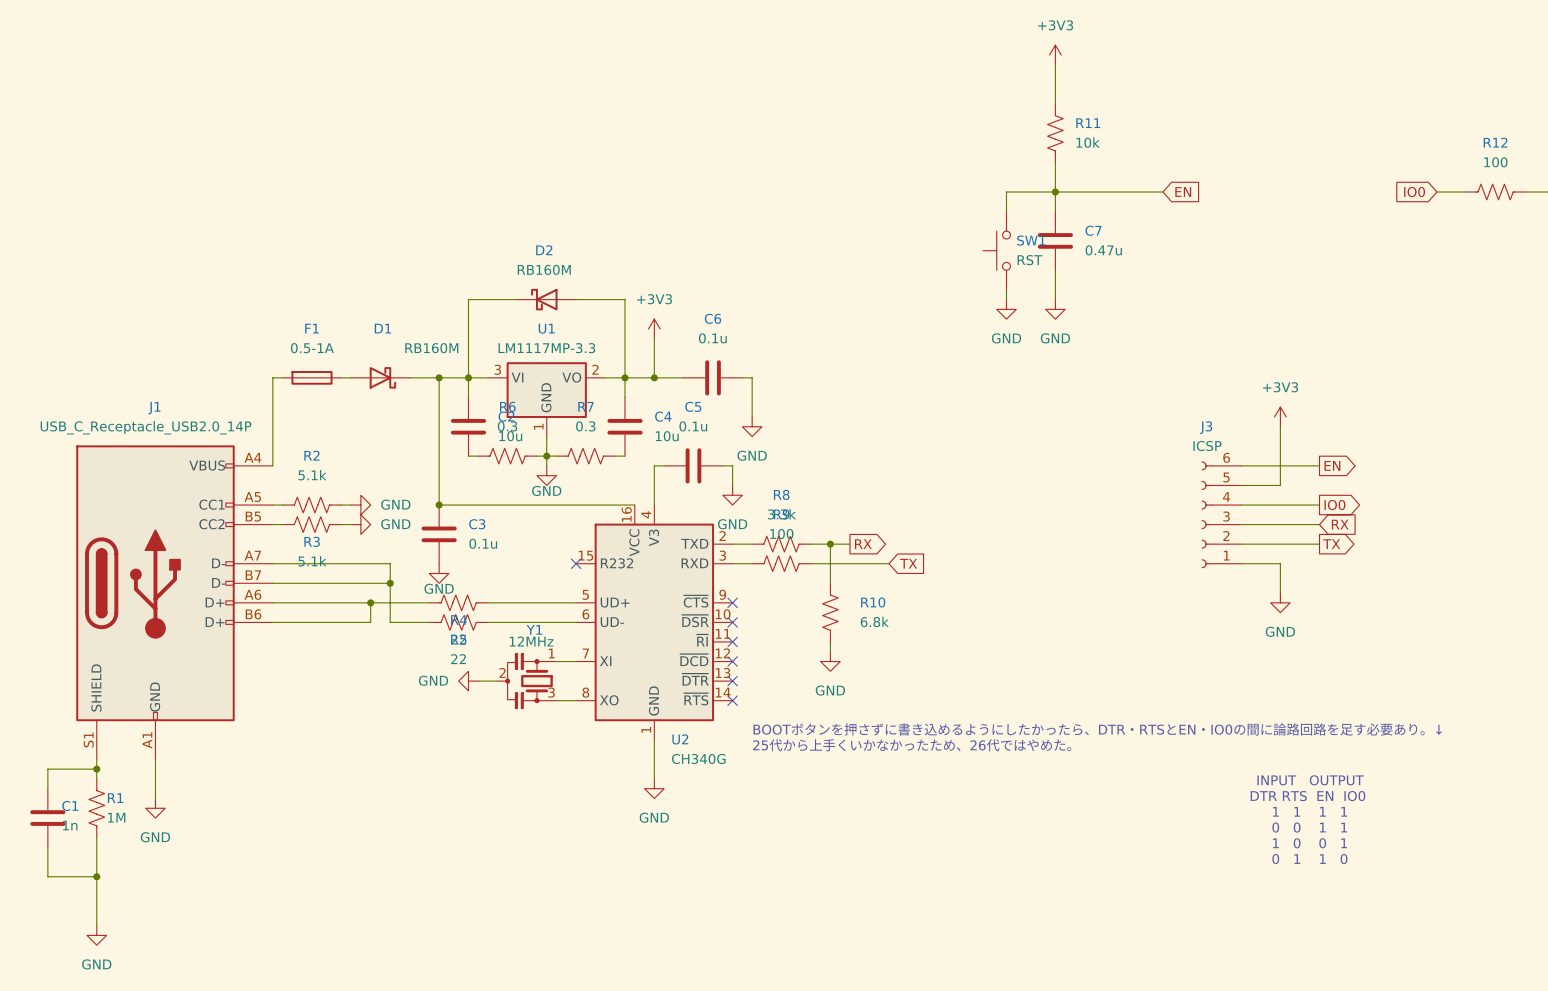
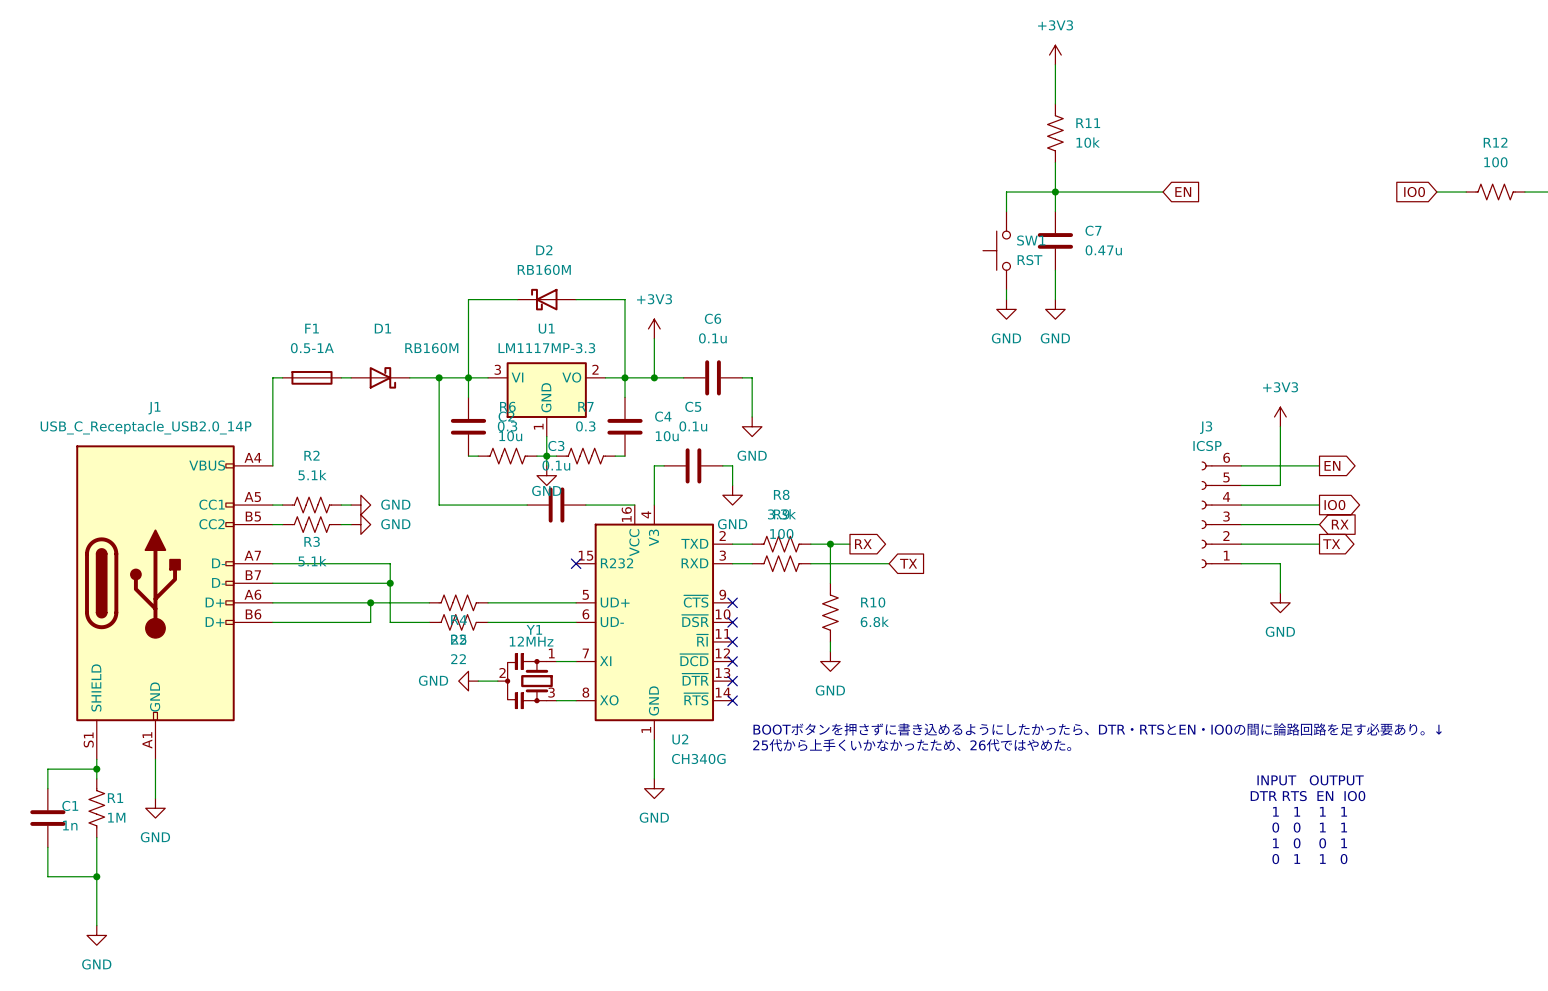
junction: (439, 505) -> none
C3 name position: C3 (477, 524) -> C3 (556, 445)
C3 rotation: 0° (439, 534) -> 90° clockwise (556, 505)
C3 position: (439, 534) -> (556, 505)
C3 value position: 0.1u (483, 543) -> 0.1u (556, 465)
power symbol: GND (439, 573) -> none

